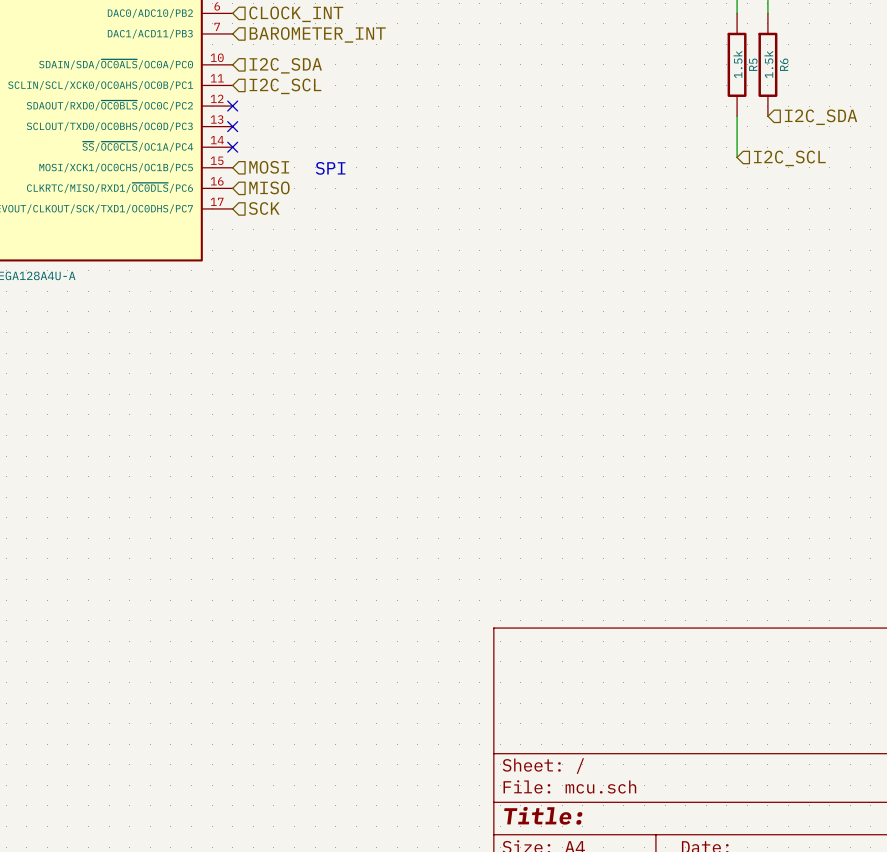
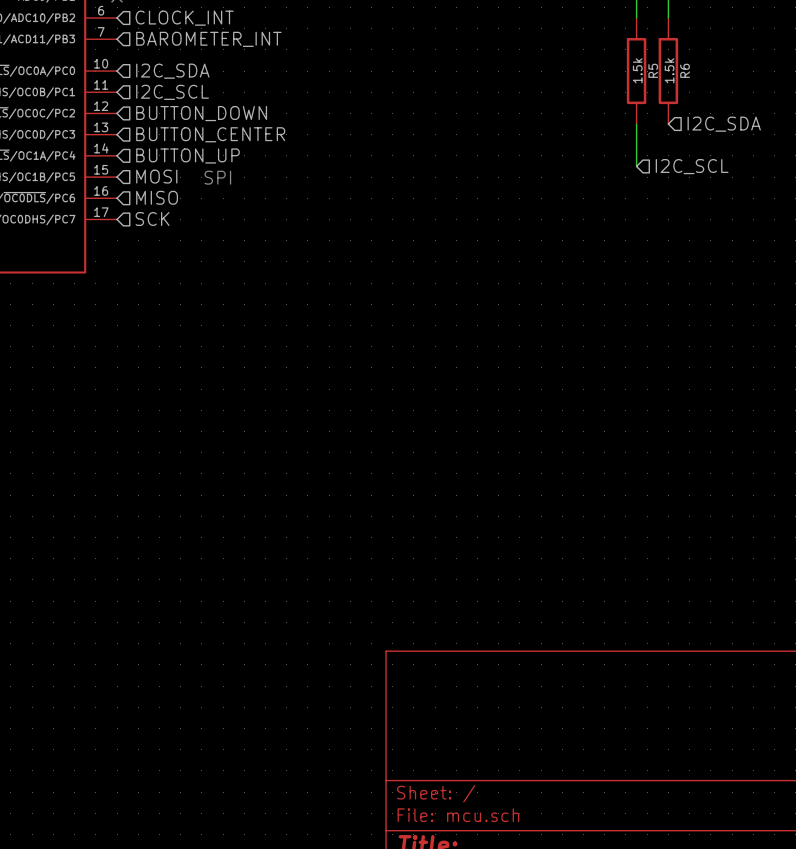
no-connect mark: (232, 106) -> none
hierarchical label: none -> BUTTON_DOWN (201, 113)
no-connect mark: (232, 126) -> none
hierarchical label: none -> BUTTON_CENTER (210, 134)
no-connect mark: (232, 147) -> none
hierarchical label: none -> BUTTON_UP (187, 155)

